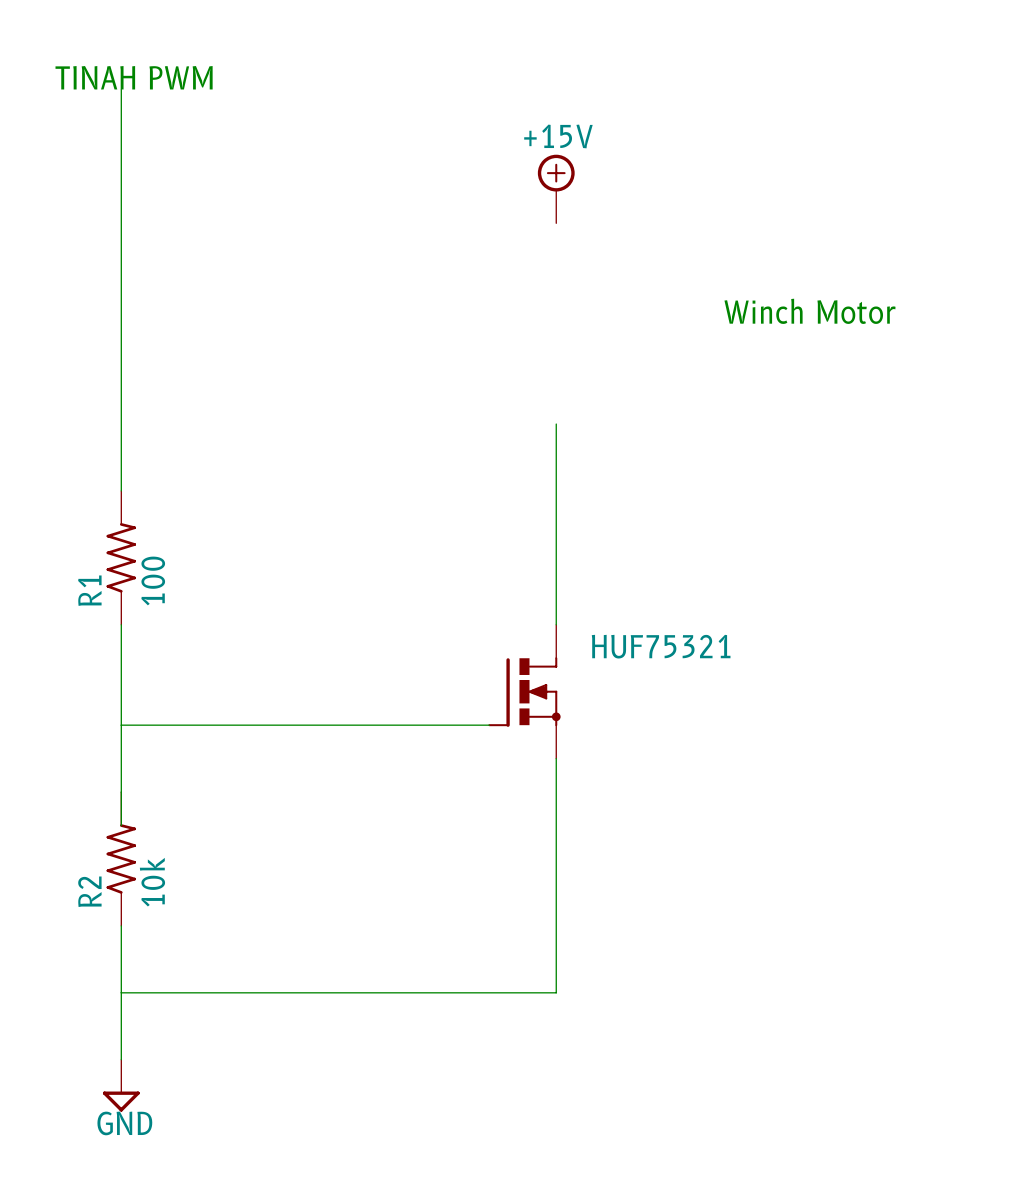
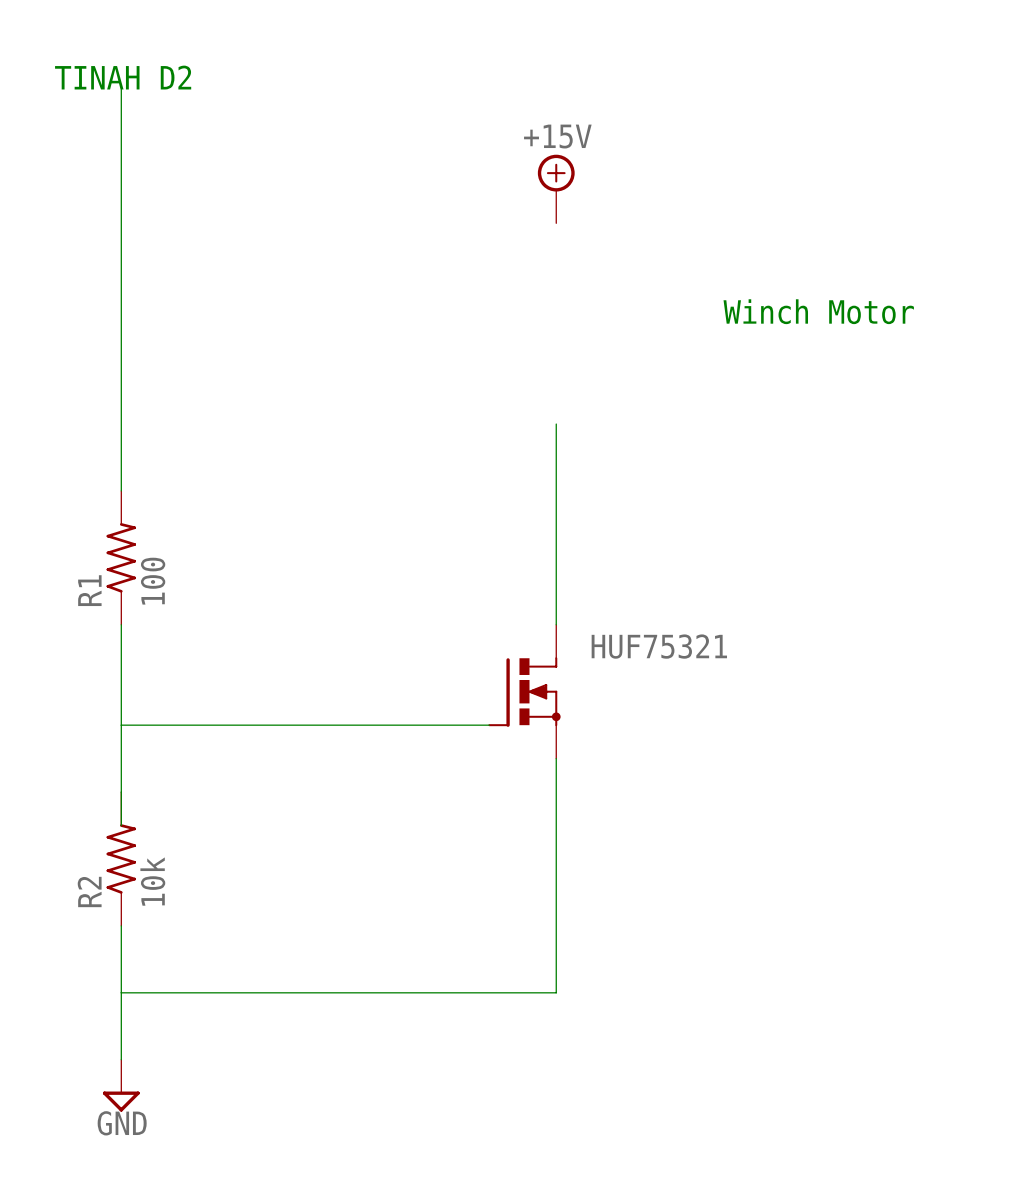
text: TINAH PWM (134, 77) -> TINAH D2 (123, 77)

